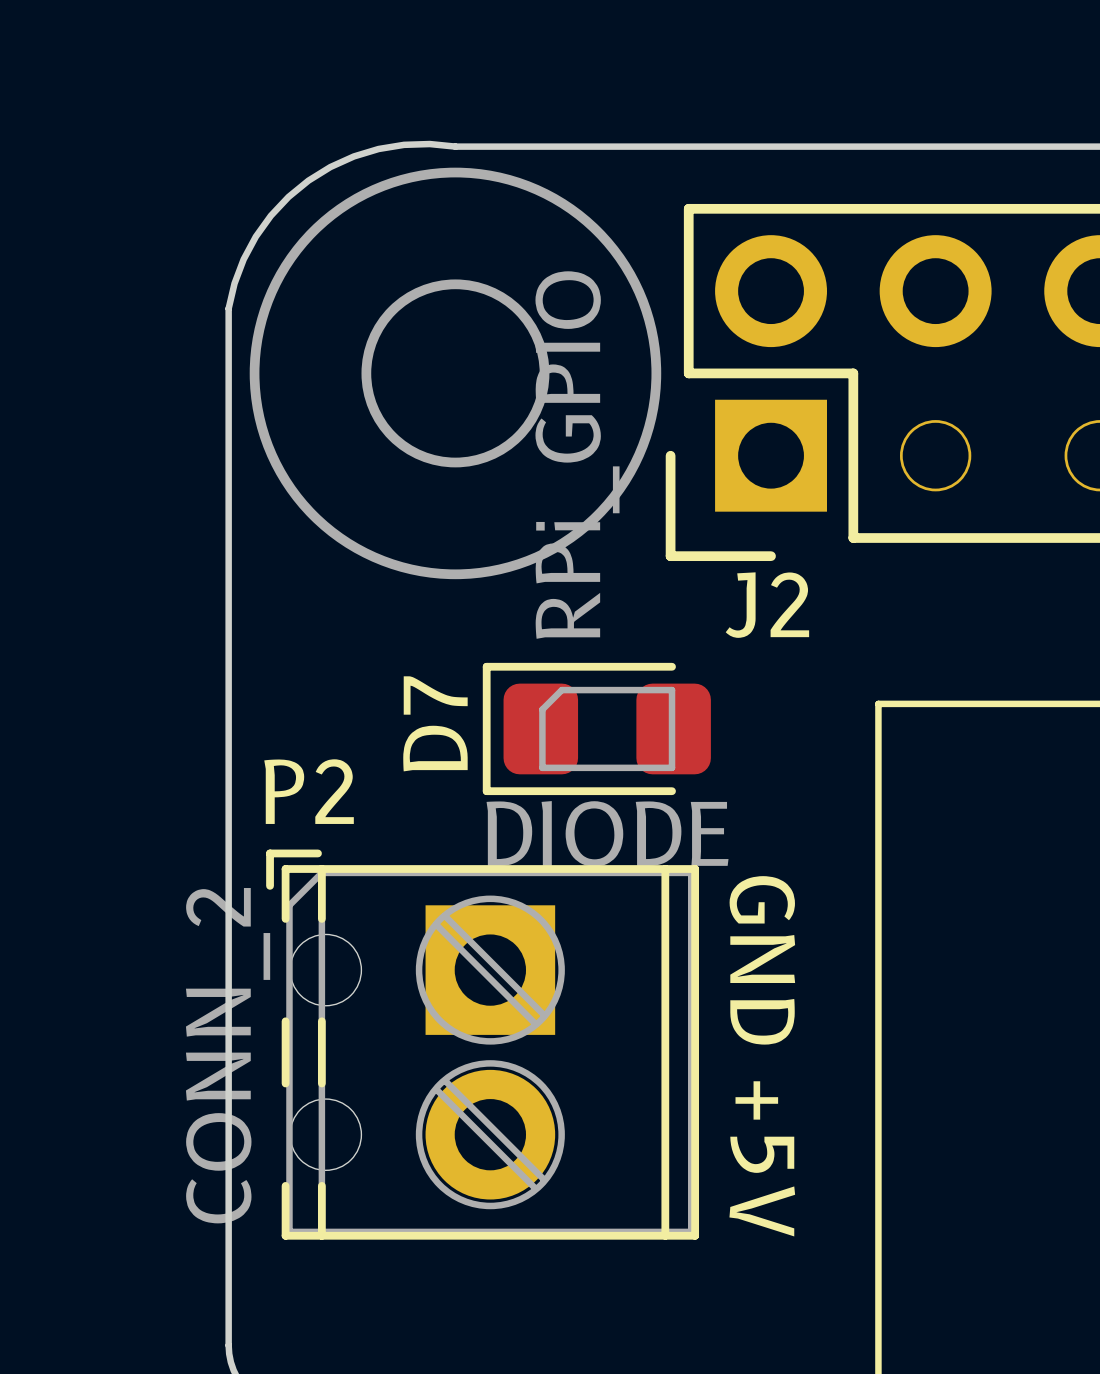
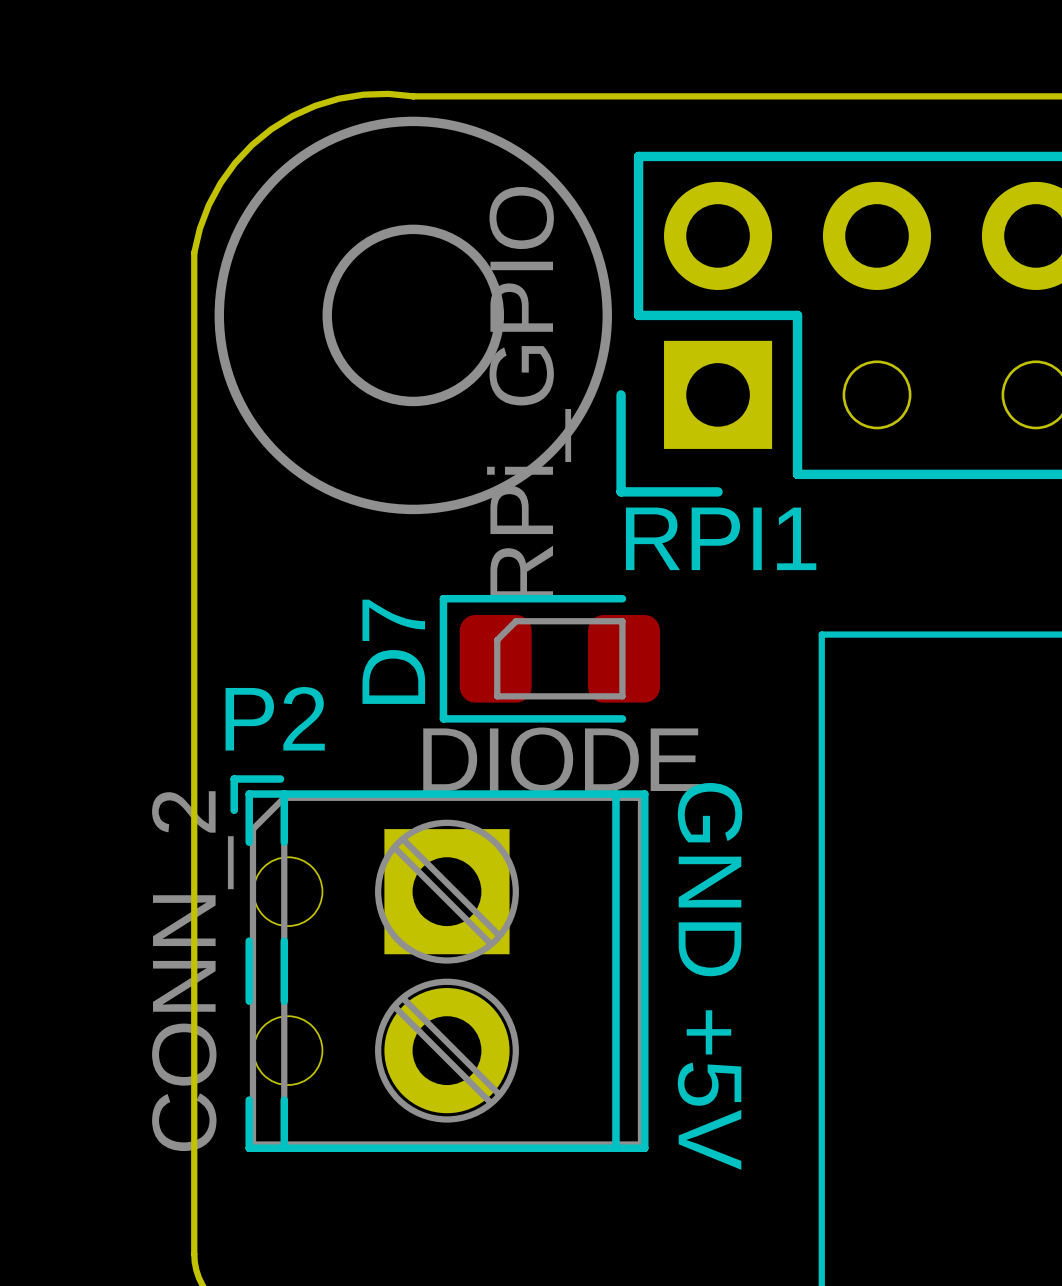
J2 name: J2 (767, 605) -> RPI1 (721, 538)

